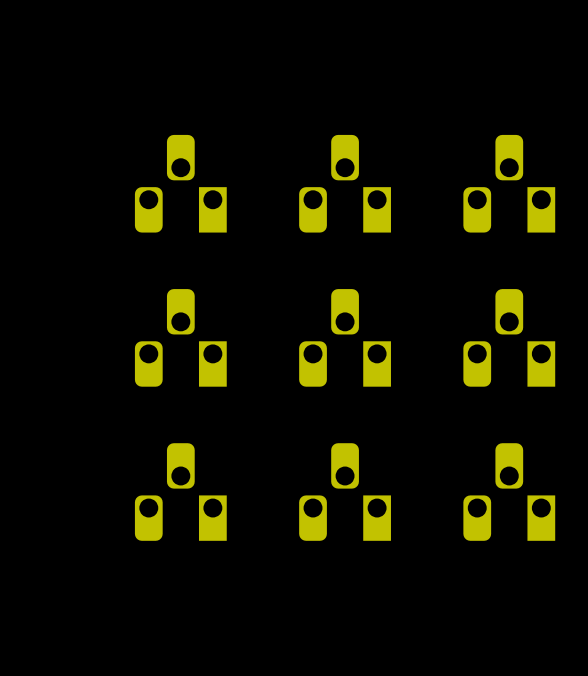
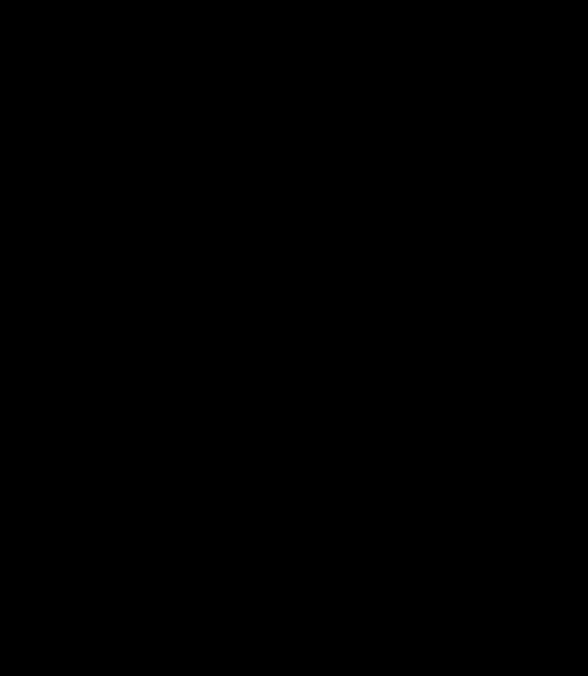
part: (180, 183) -> none
part: (345, 183) -> none
part: (509, 183) -> none
part: (180, 337) -> none
part: (345, 337) -> none
part: (509, 337) -> none
part: (180, 492) -> none
part: (345, 492) -> none
part: (509, 492) -> none

